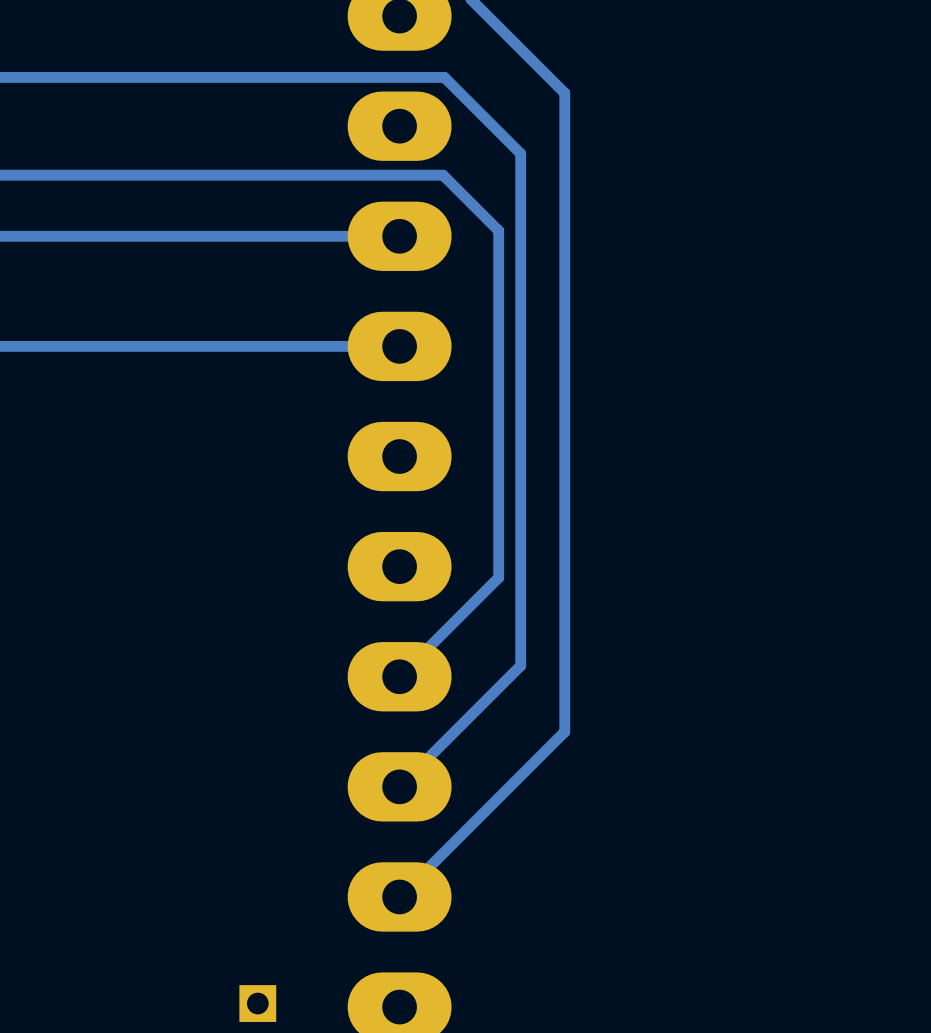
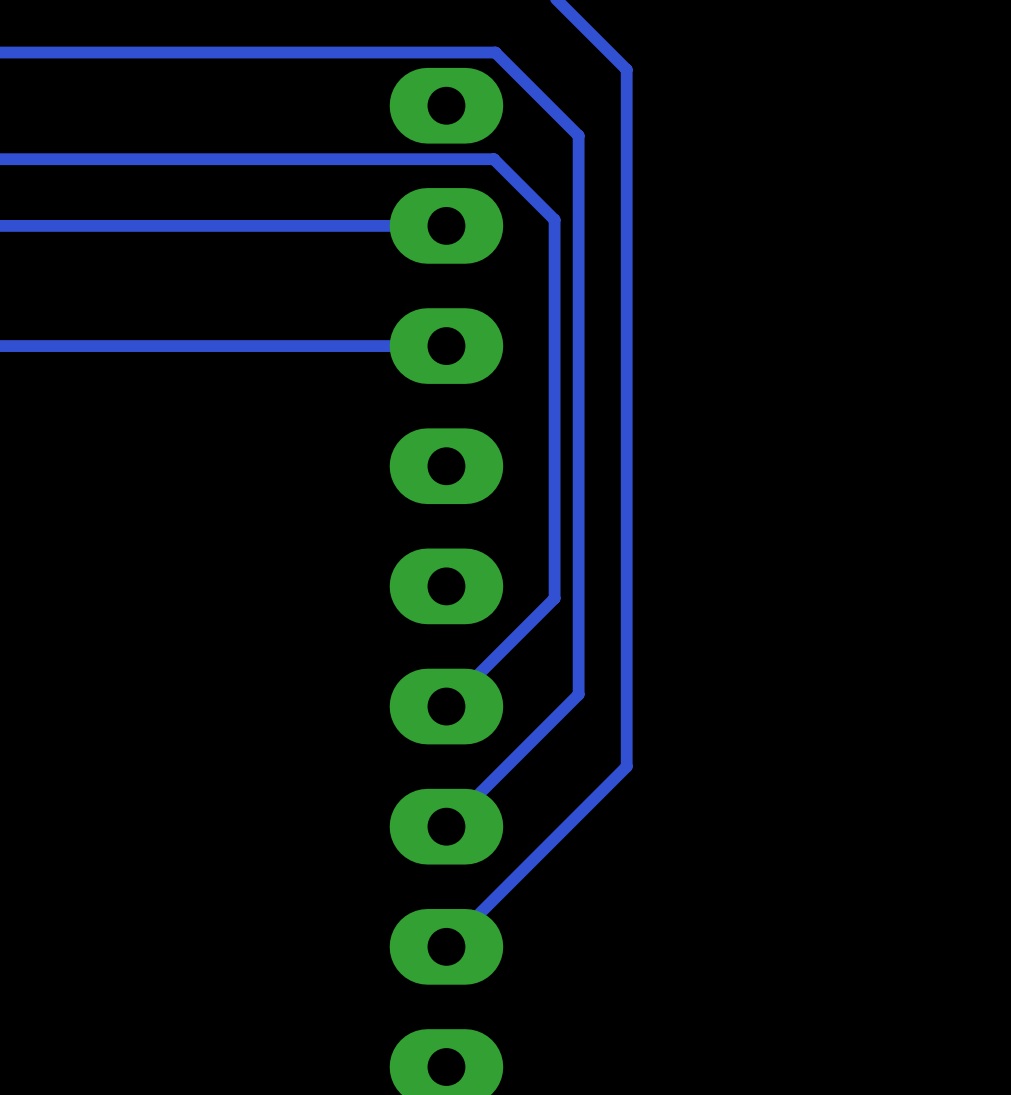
part: (257, 1003) -> none

